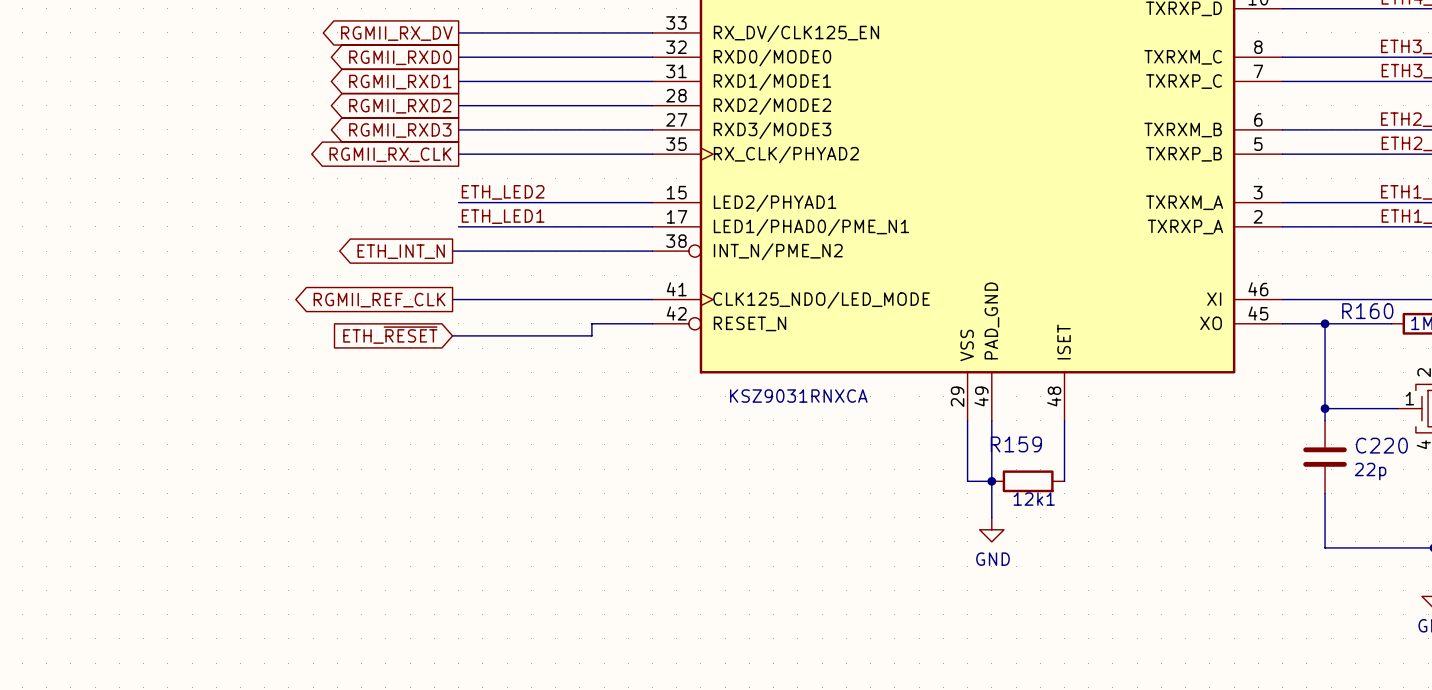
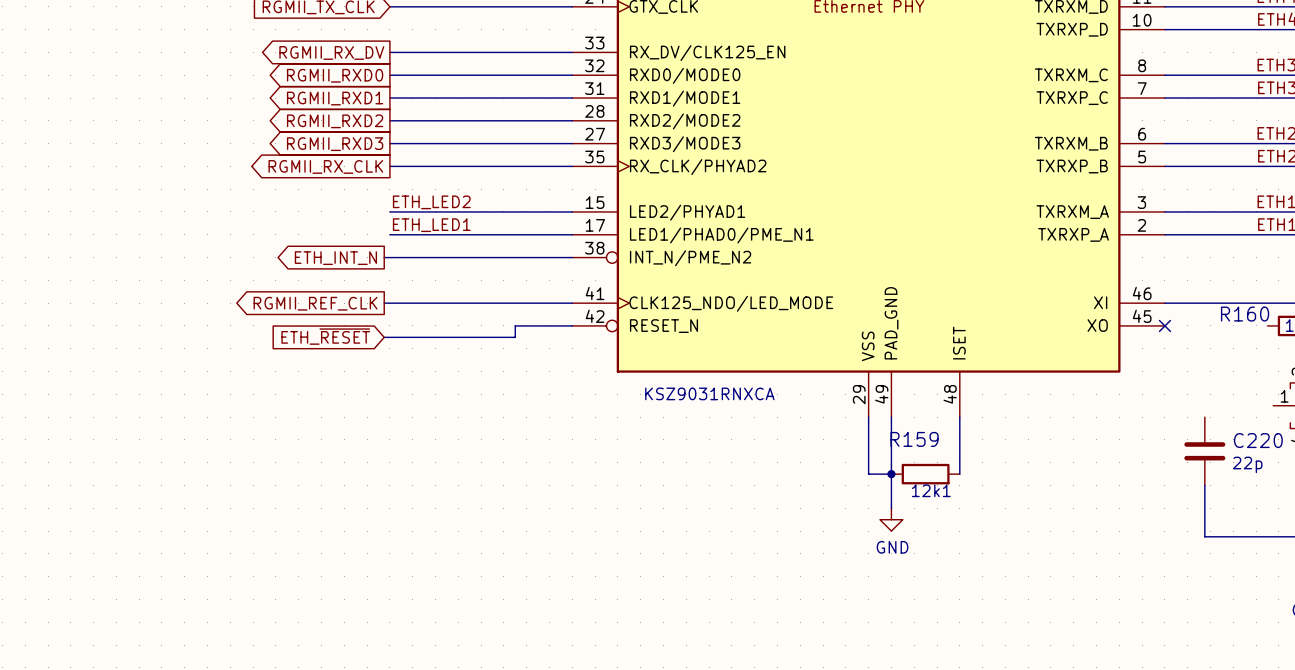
wire: (1282, 323) (1391, 323) -> none
no-connect mark: none -> (1164, 325)
wire: (1325, 323) (1325, 420) -> none
junction: (1325, 323) -> none
wire: (1325, 408) (1397, 408) -> none
junction: (1325, 408) -> none

